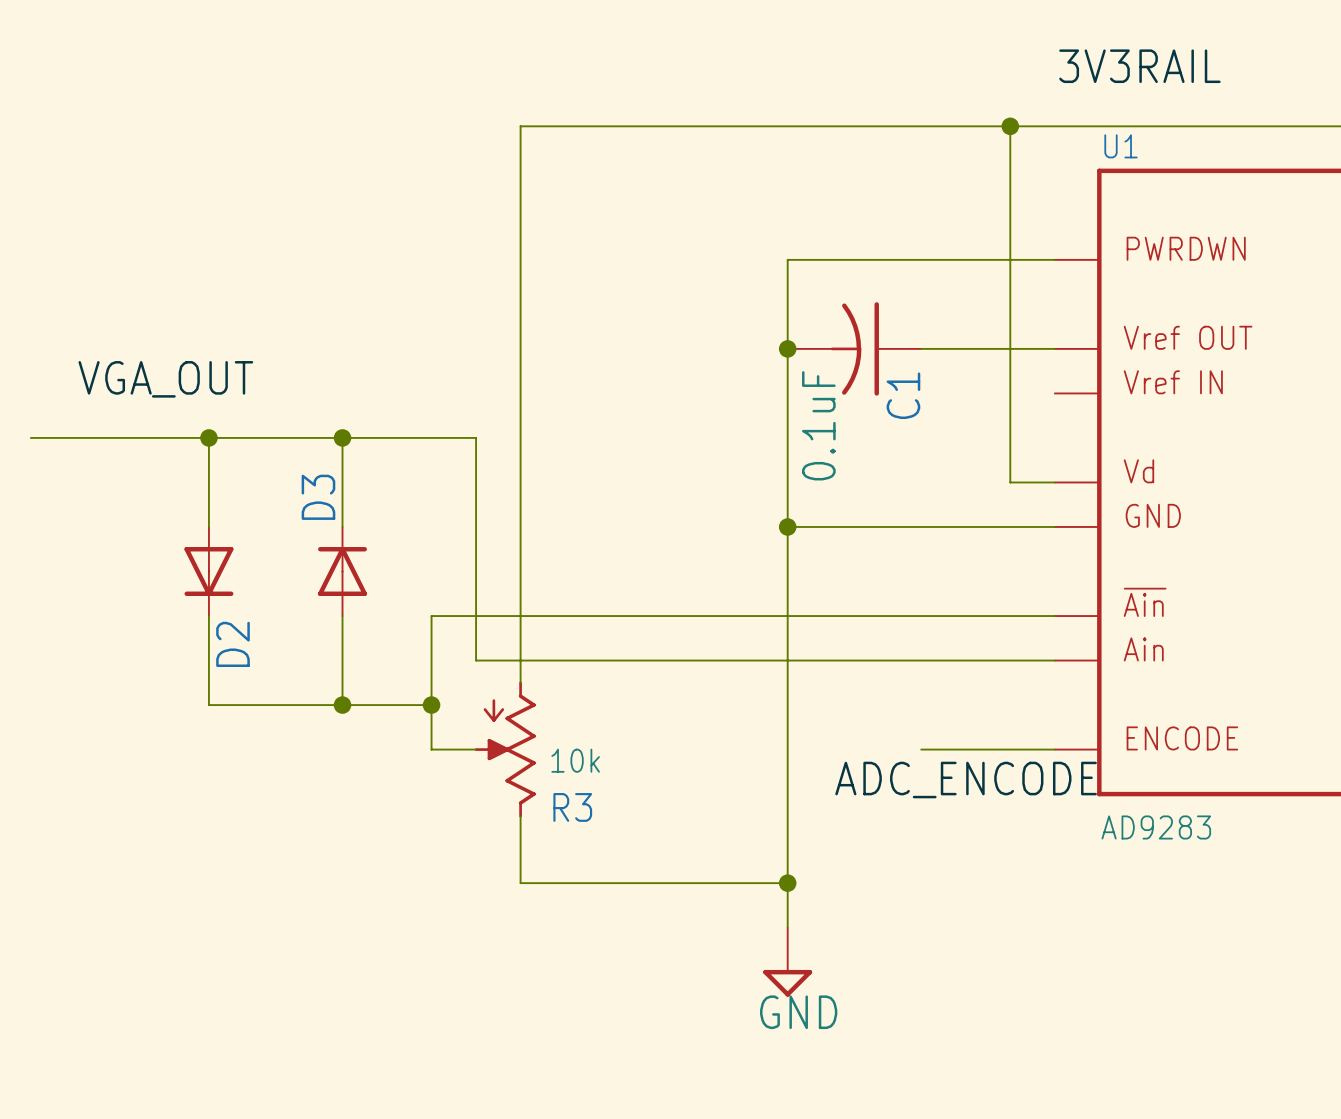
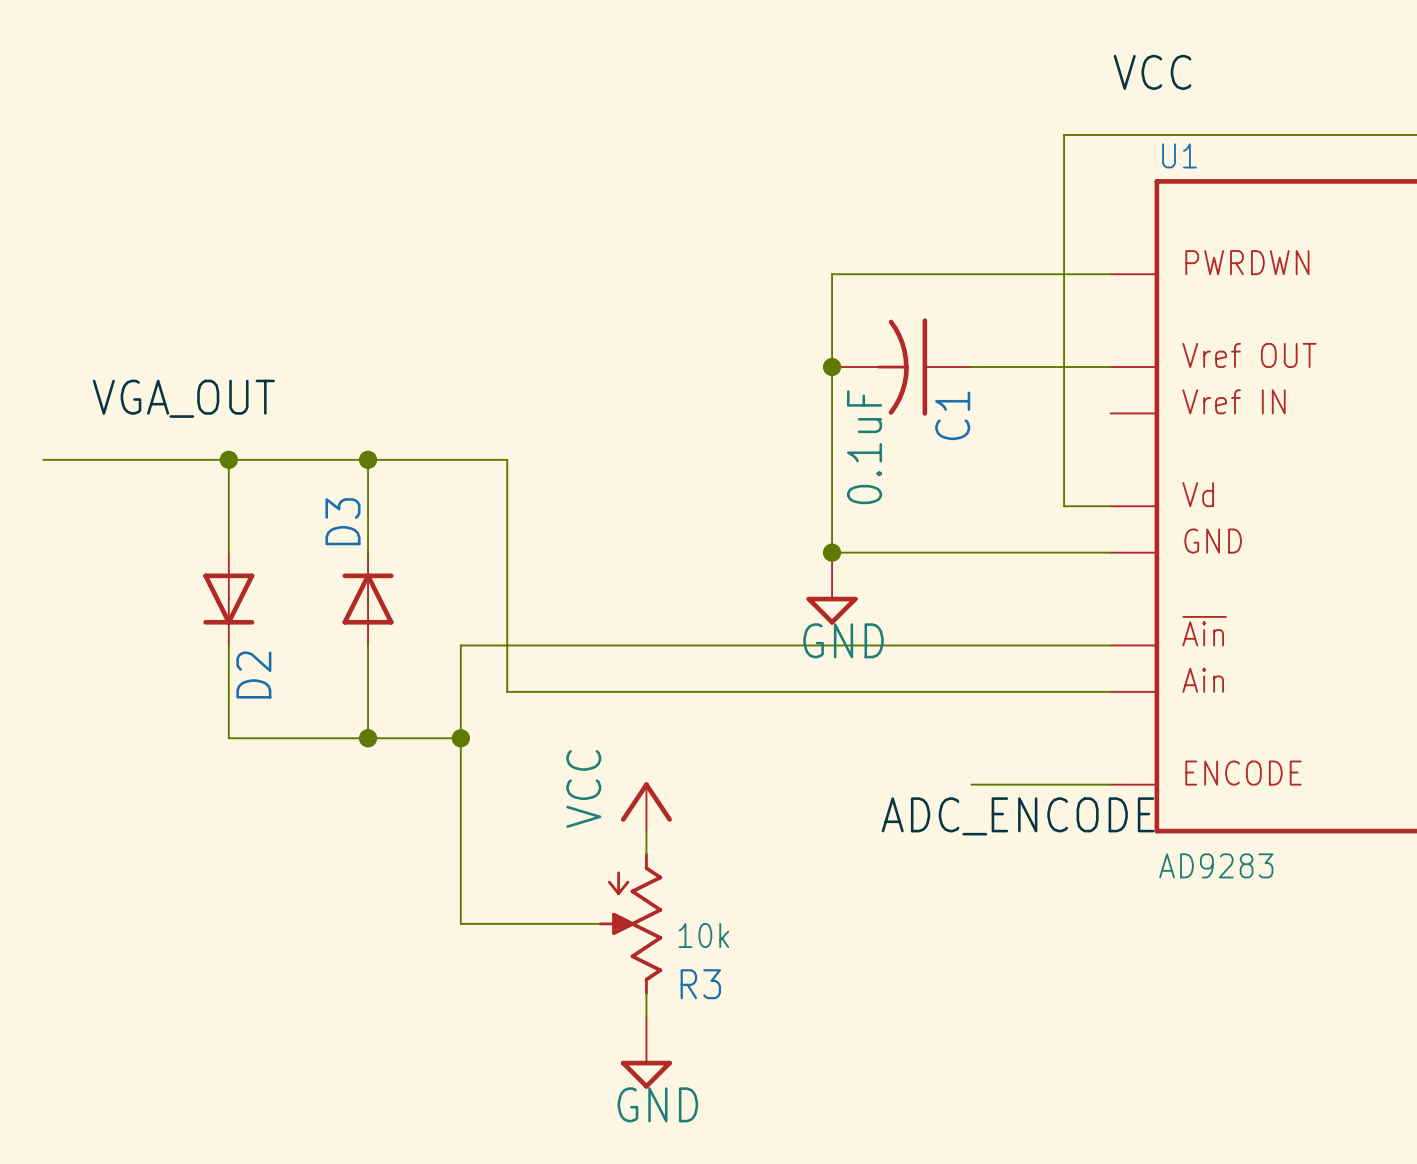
label: 3V3RAIL (1139, 66) -> VCC (1152, 72)
wire: (1010, 126) (520, 126) (520, 682) -> none
junction: (1010, 126) -> none
wire: (787, 526) (787, 927) -> none
power symbol: none -> GND (832, 588)
wire: (431, 749) (476, 749) -> none
R3 position: (505, 749) -> (630, 923)
power symbol: none -> VCC (646, 806)
wire: none -> (646, 831) (646, 854)
wire: (520, 816) (520, 883) -> (460, 784) (460, 923) (553, 923)
wire: (565, 883) (787, 883) -> none
junction: (787, 883) -> none
wire: none -> (646, 993) (646, 1016)
power symbol position: GND (787, 962) -> GND (646, 1052)

